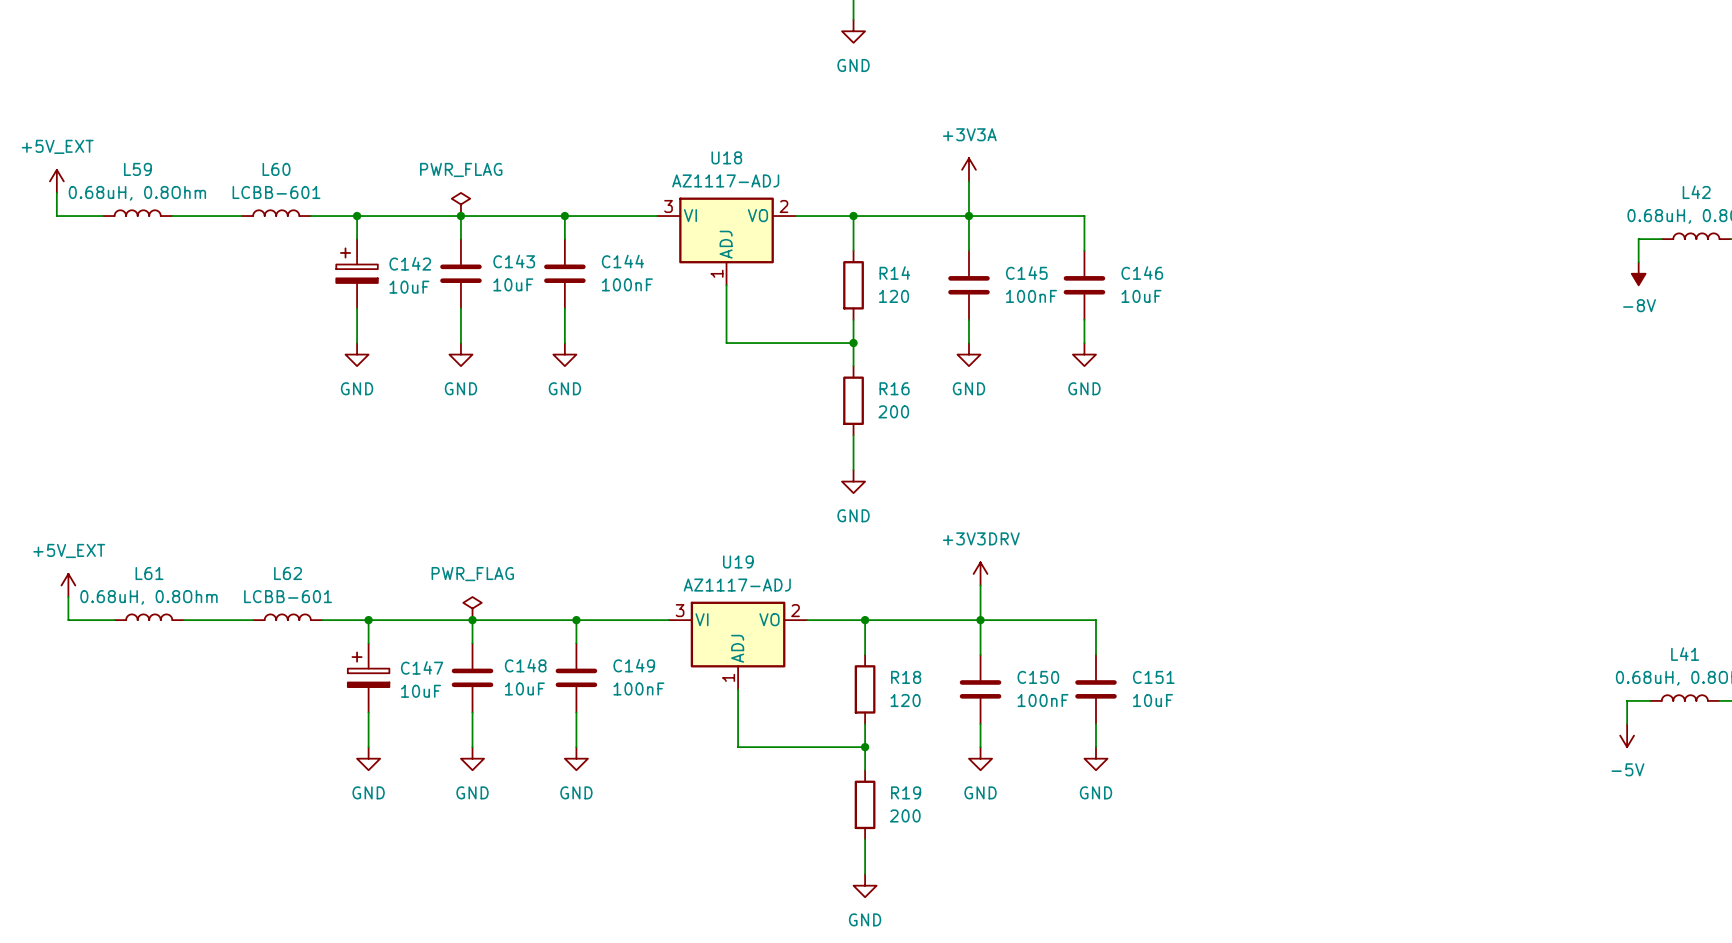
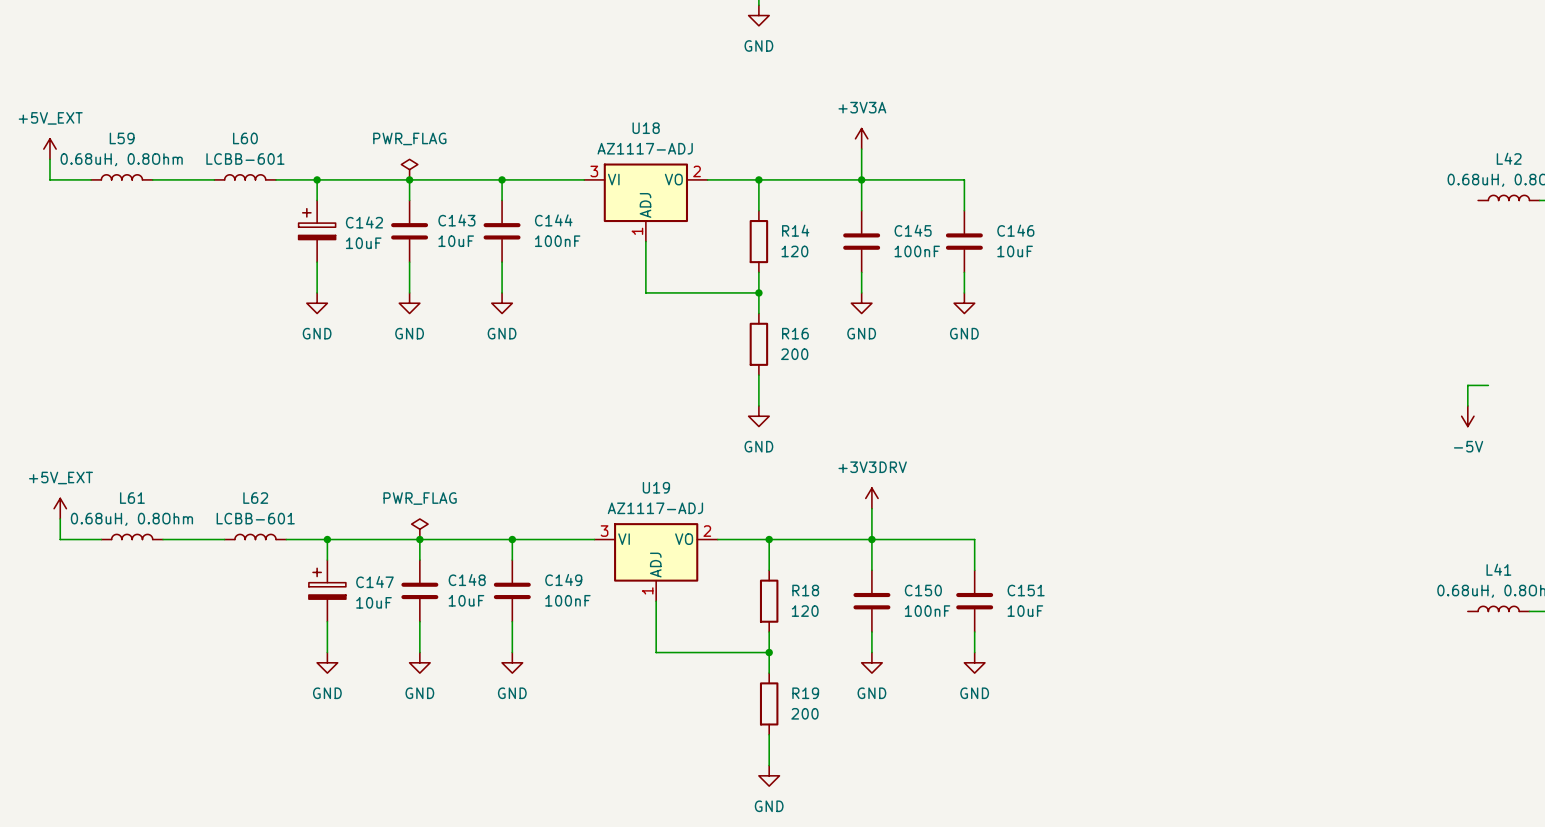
wire: (1661, 239) (1638, 239) (1638, 262) -> (1488, 385) (1467, 385) (1467, 405)
power symbol: -8V (1638, 273) -> none
power symbol: none -> -5V (1467, 416)
wire: (1650, 700) (1627, 700) (1627, 724) -> none
power symbol: -5V (1627, 735) -> none

